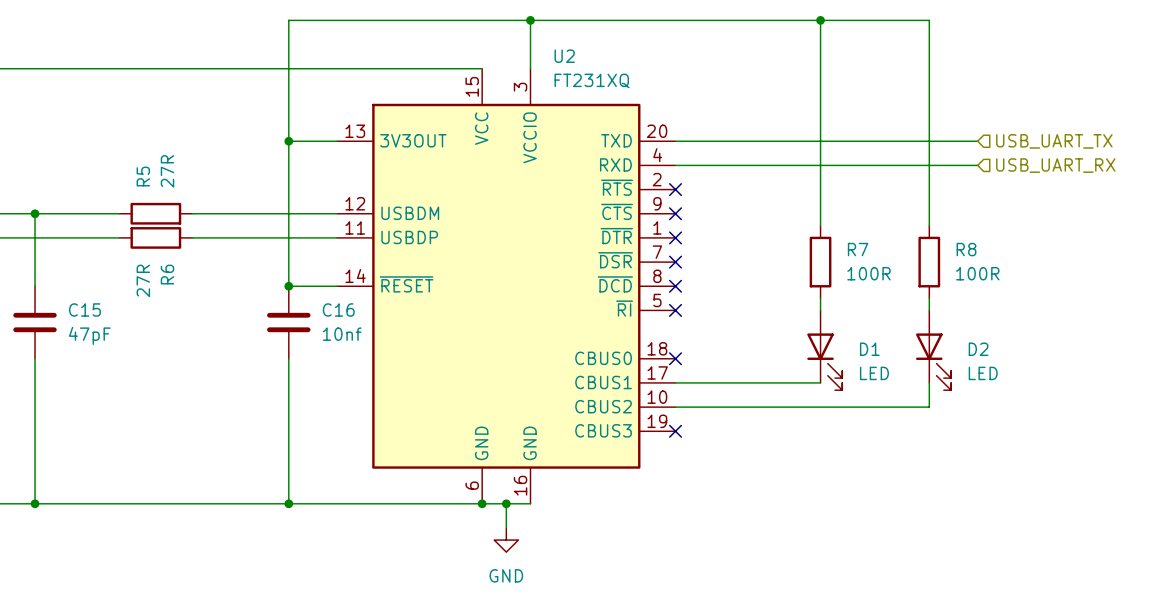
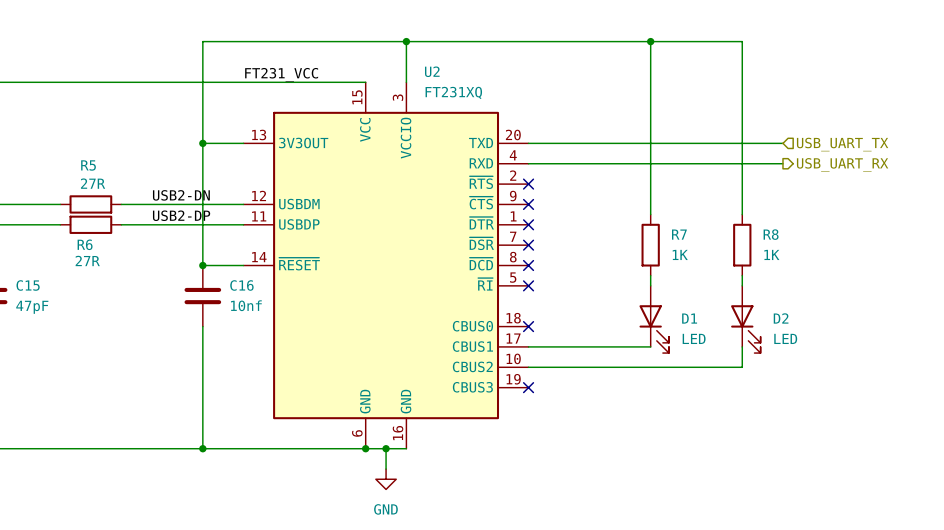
label: none -> FT231_VCC (281, 74)
hierarchical label shape: input (1055, 165) -> output (842, 164)
R5 value rotation: 0° (167, 171) -> 90° clockwise (93, 183)
R5 name rotation: 0° (143, 176) -> 90° clockwise (88, 165)
label: none -> USB2-DN (181, 195)
label: none -> USB2-DP (181, 215)
R7 value: 100R (868, 273) -> 1K (680, 254)
R8 value: 100R (977, 273) -> 1K (771, 254)
R6 name rotation: 0° (167, 274) -> 90° clockwise (85, 244)
R6 value rotation: 0° (143, 280) -> 90° clockwise (87, 260)

